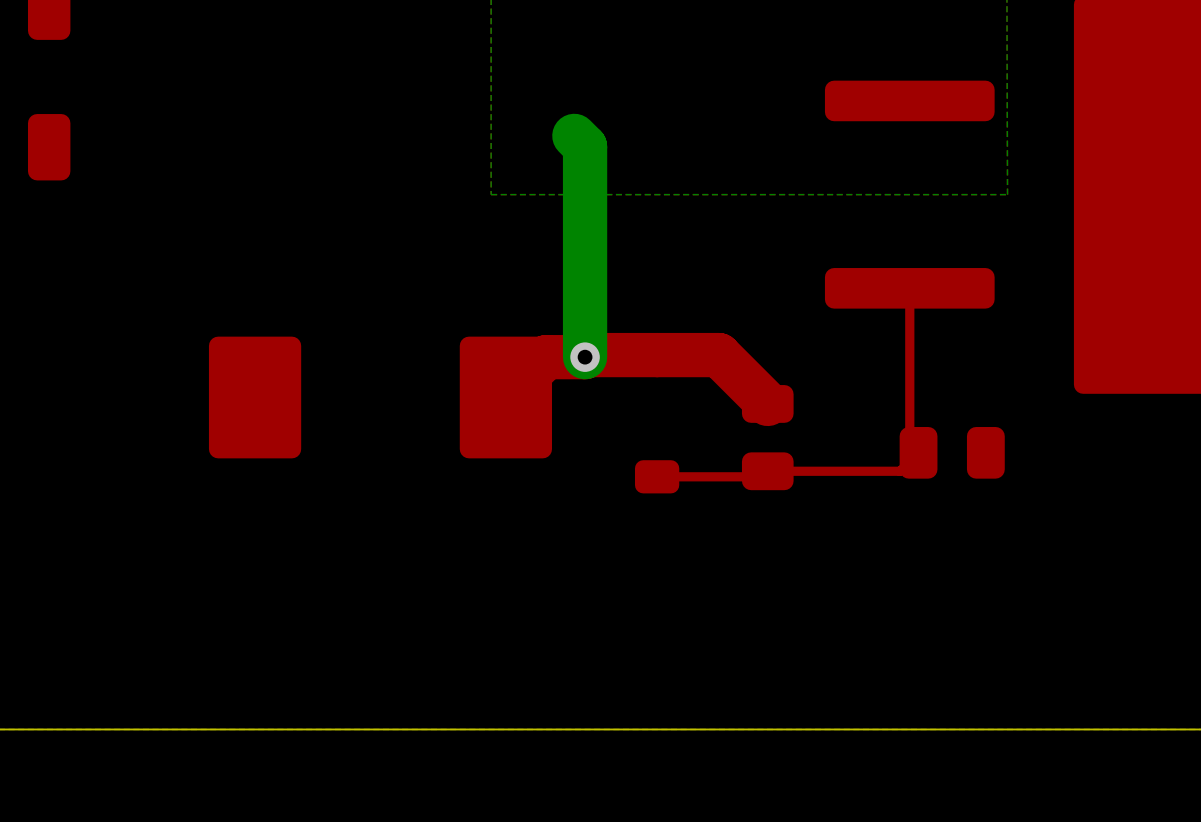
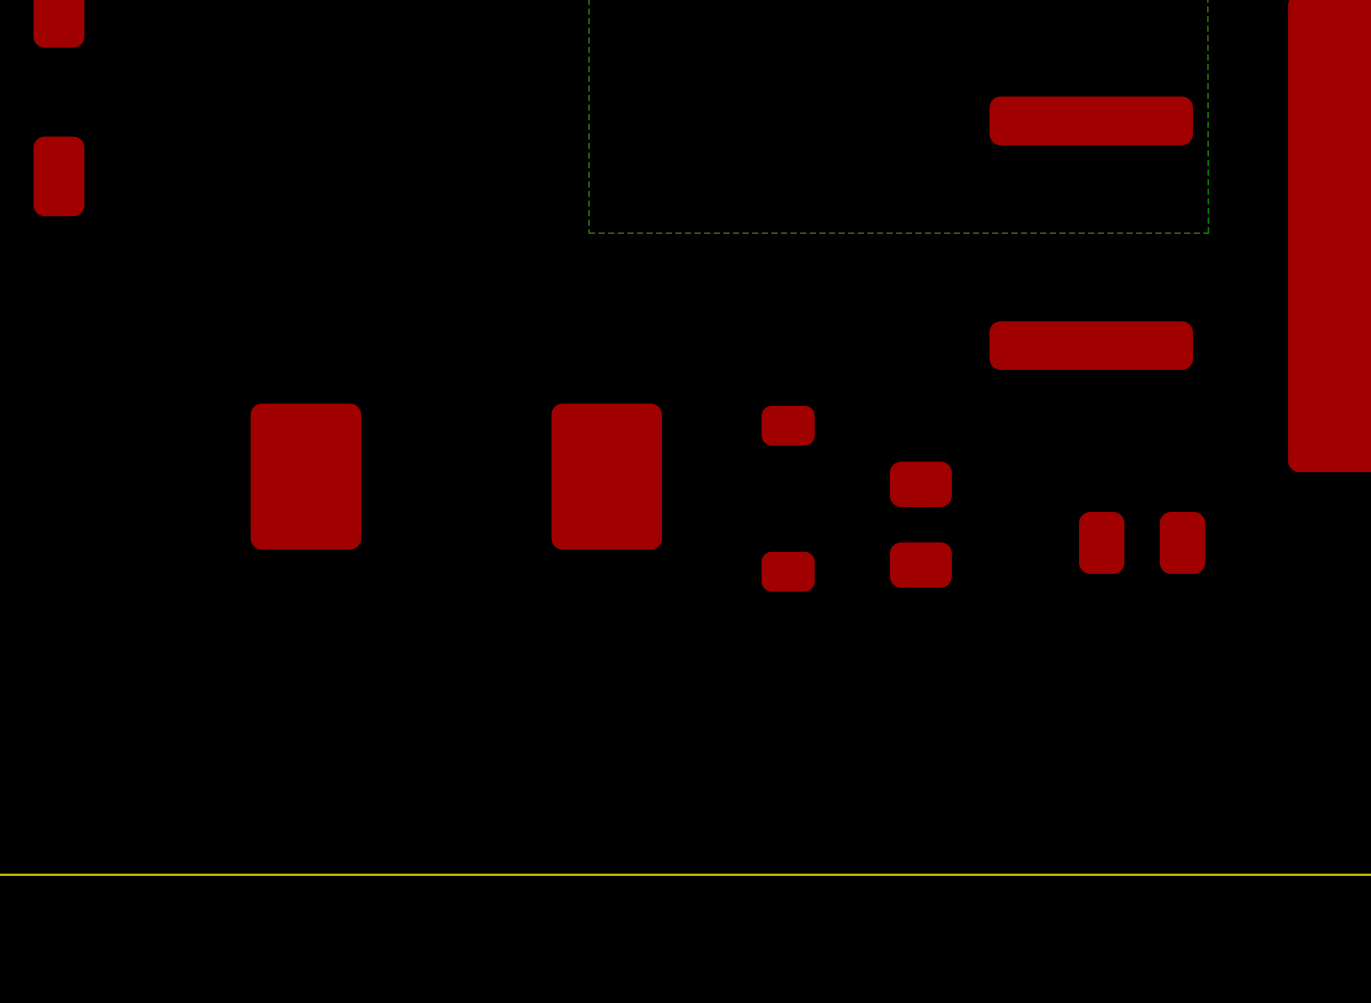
bottom track: (574, 135) (585, 146) (585, 357) -> none
top track: (909, 288) (909, 444) (918, 452) (900, 471) (767, 471) (762, 476) (657, 476) -> none
via: (585, 357) -> none
top track: (505, 397) (546, 357) (585, 357) (587, 355) (718, 355) (767, 403) -> none

